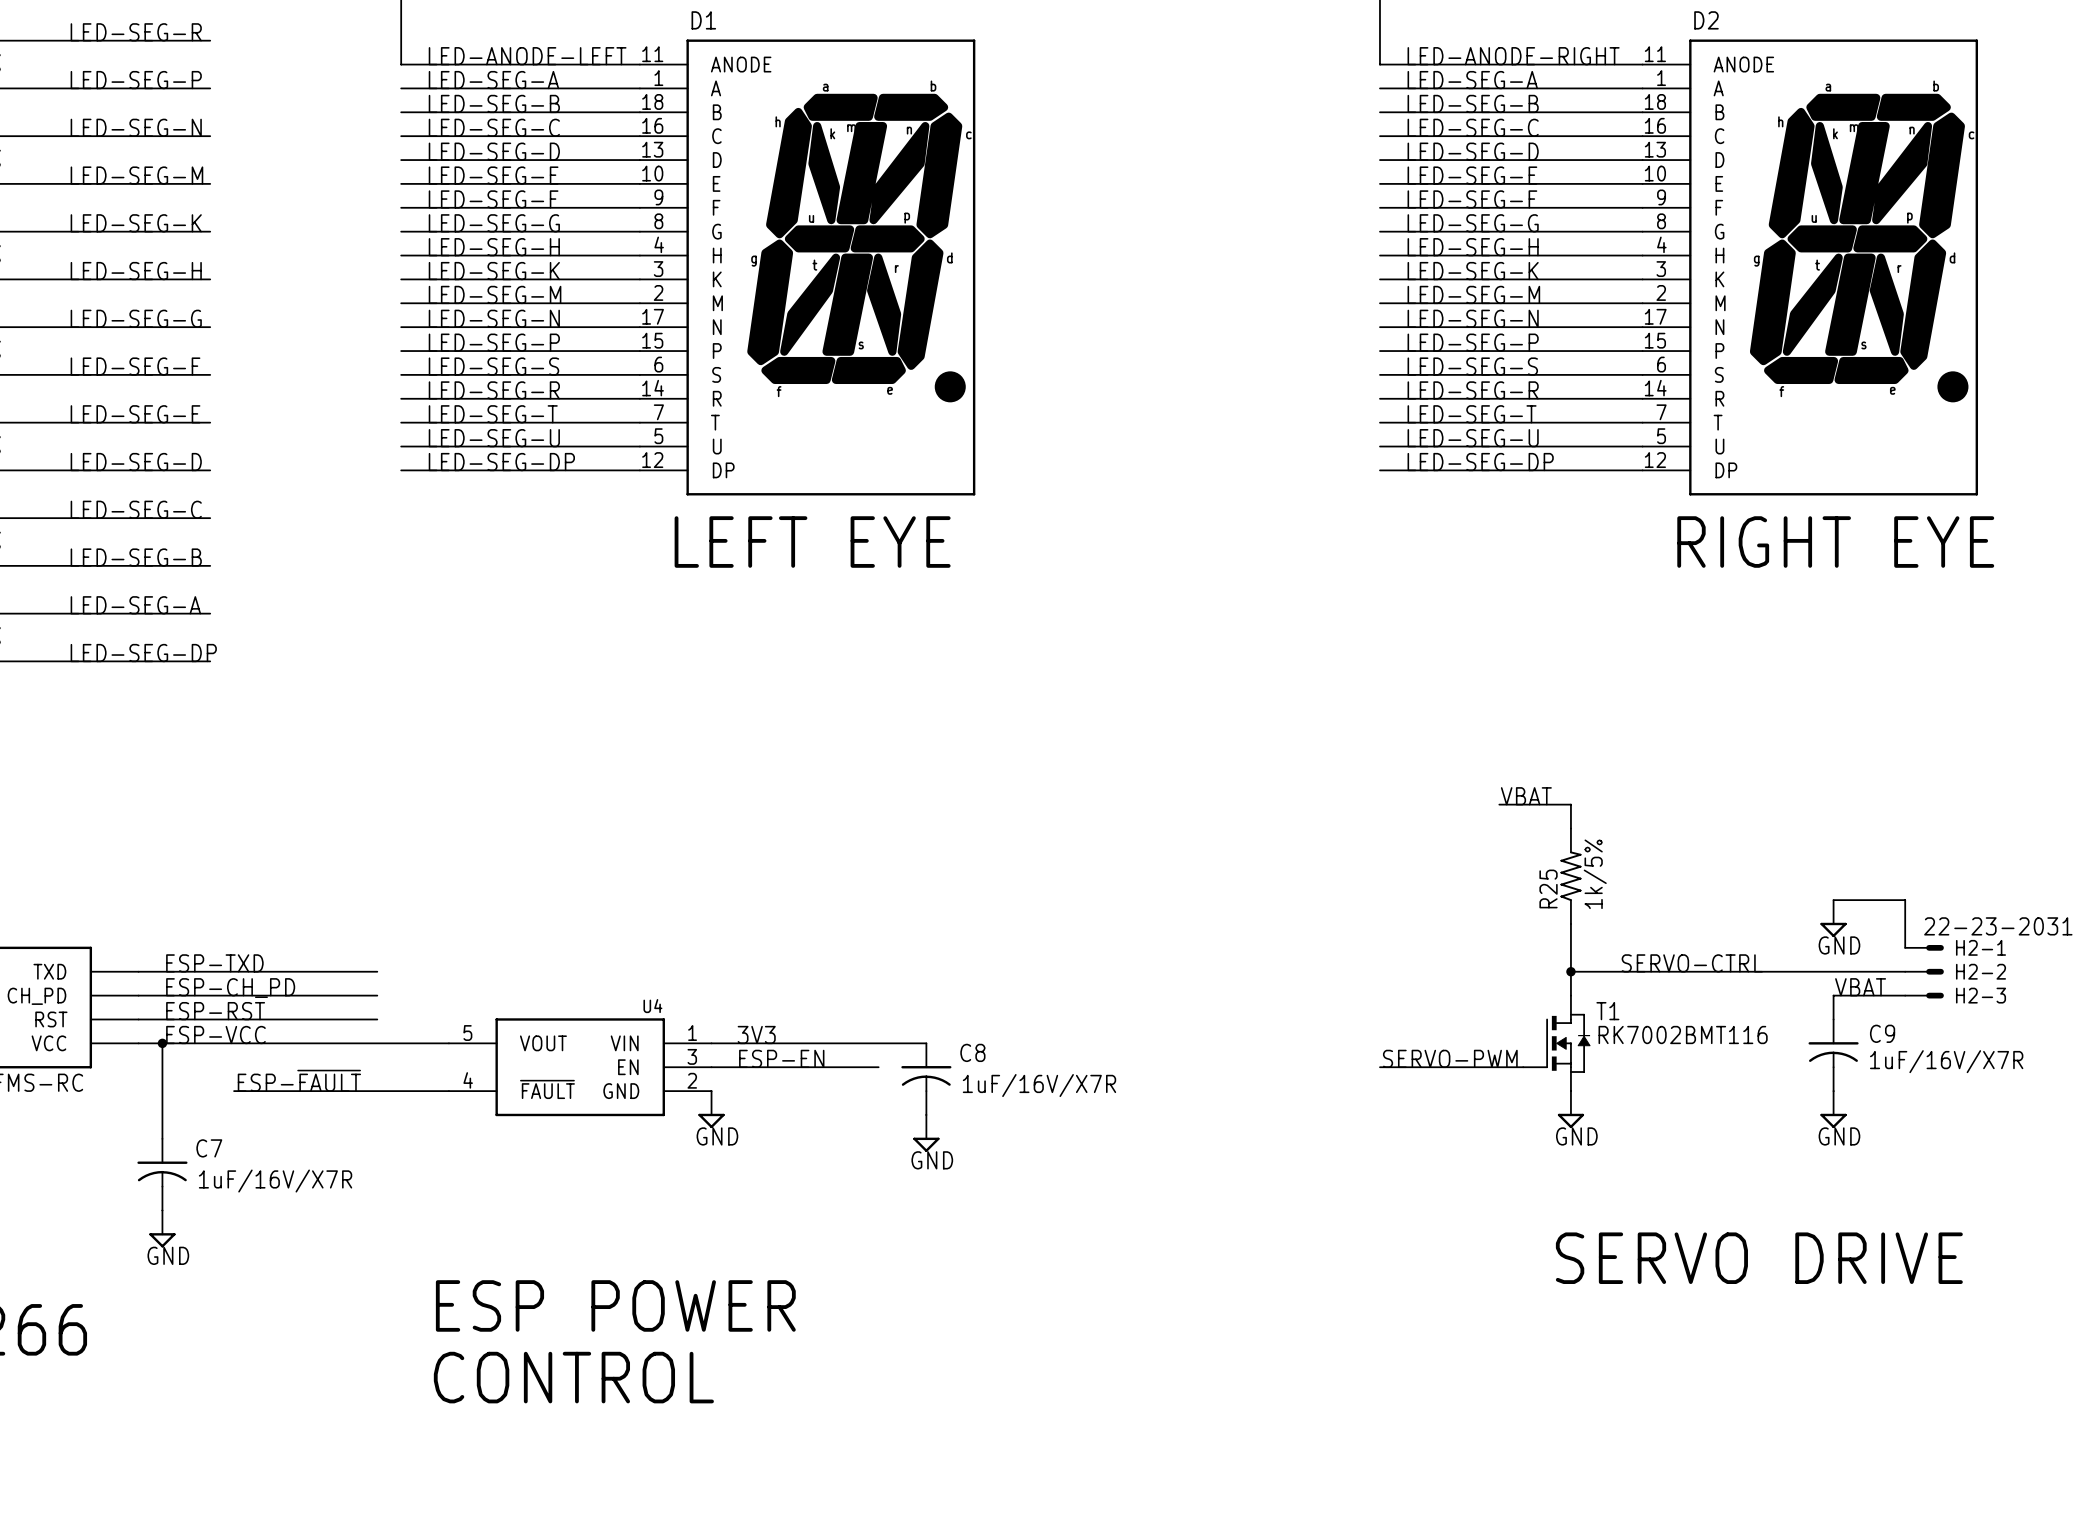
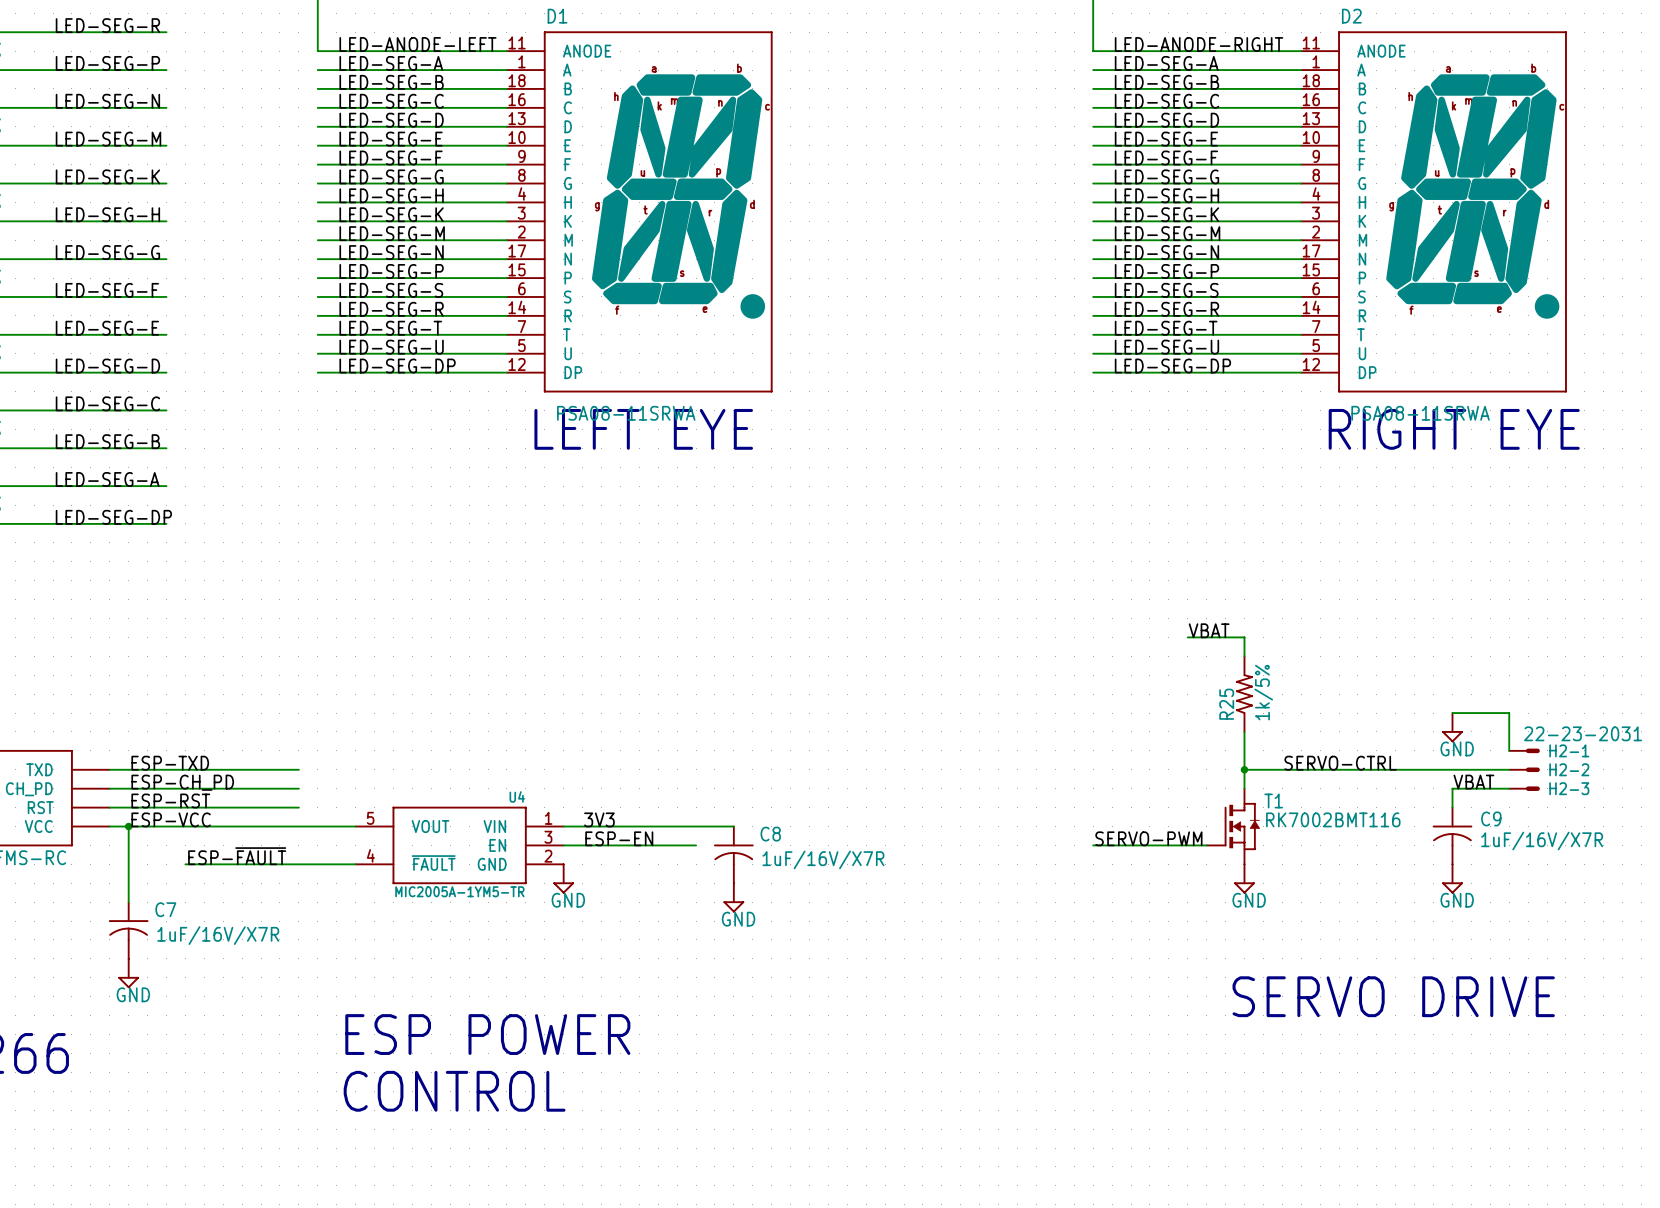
D1 value: none -> PSA08-11SRWA (626, 413)
D2 value: none -> PSA08-11SRWA (1420, 413)
U4 value: none -> MIC2005A-1YM5-TR (459, 891)

